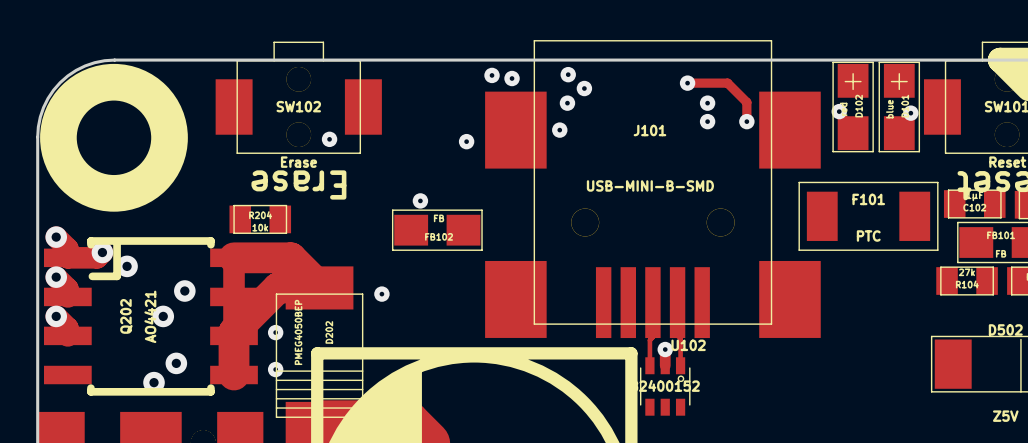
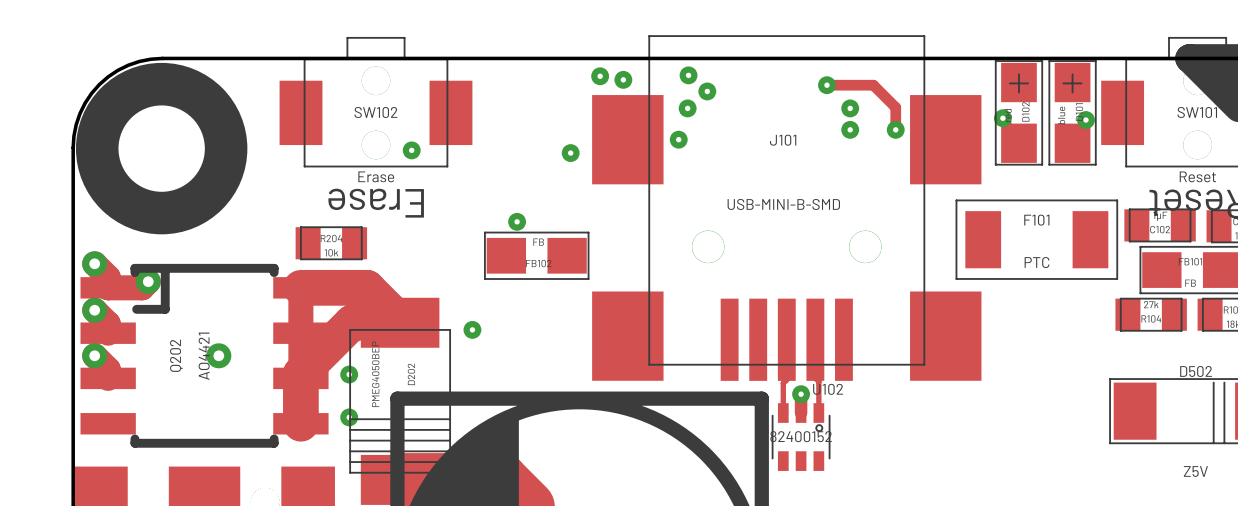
via: (127, 266) -> none
via: (184, 291) -> none
via: (176, 363) -> none
via: (154, 382) -> none

